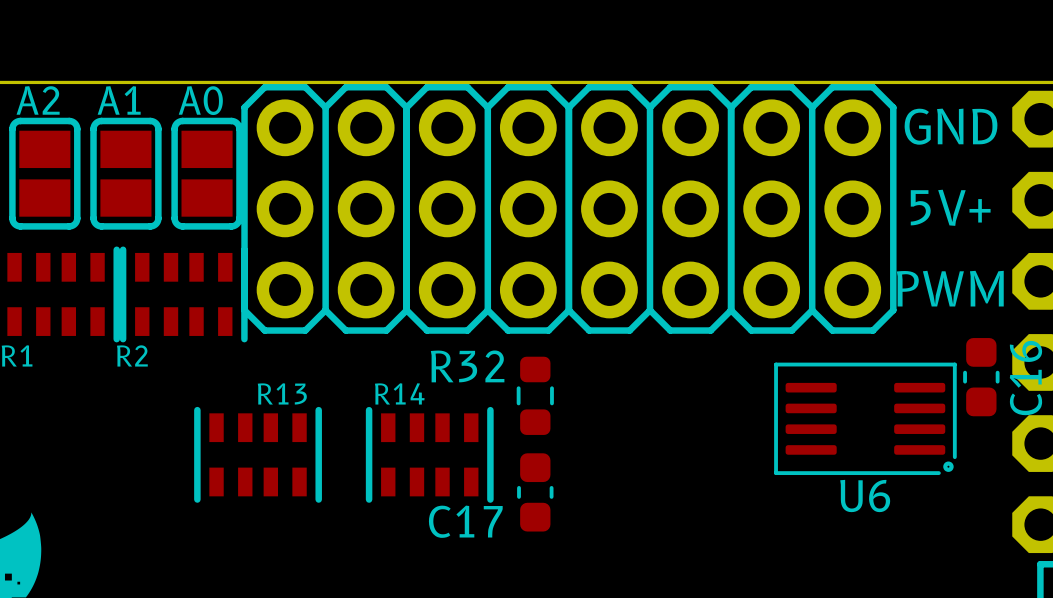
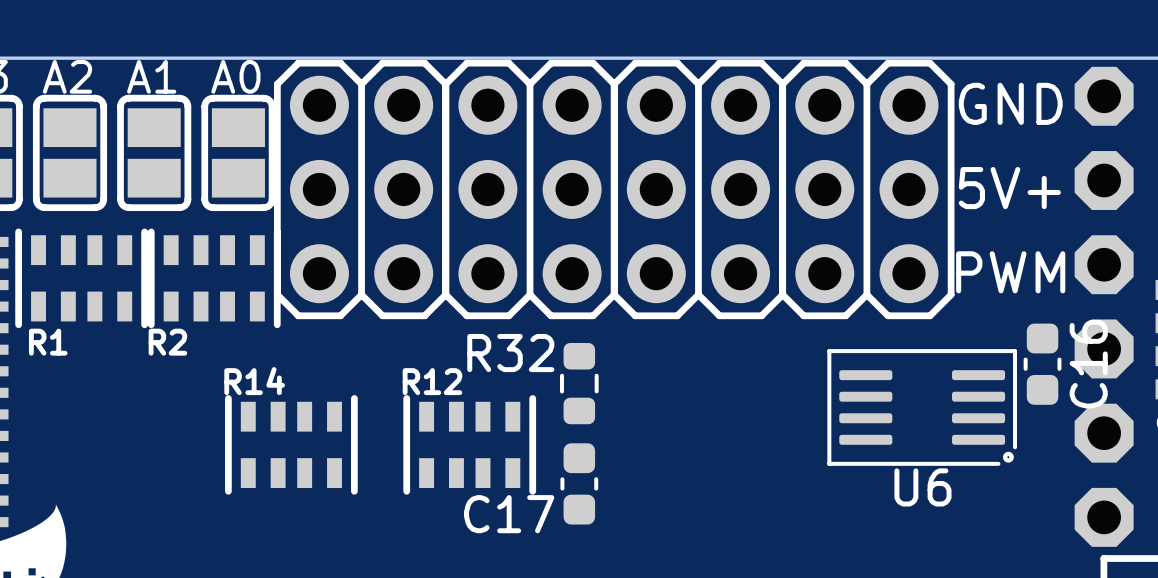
R13 name: R13 (282, 393) -> R14 (254, 381)
R14 name: R14 (399, 393) -> R12 (432, 381)

